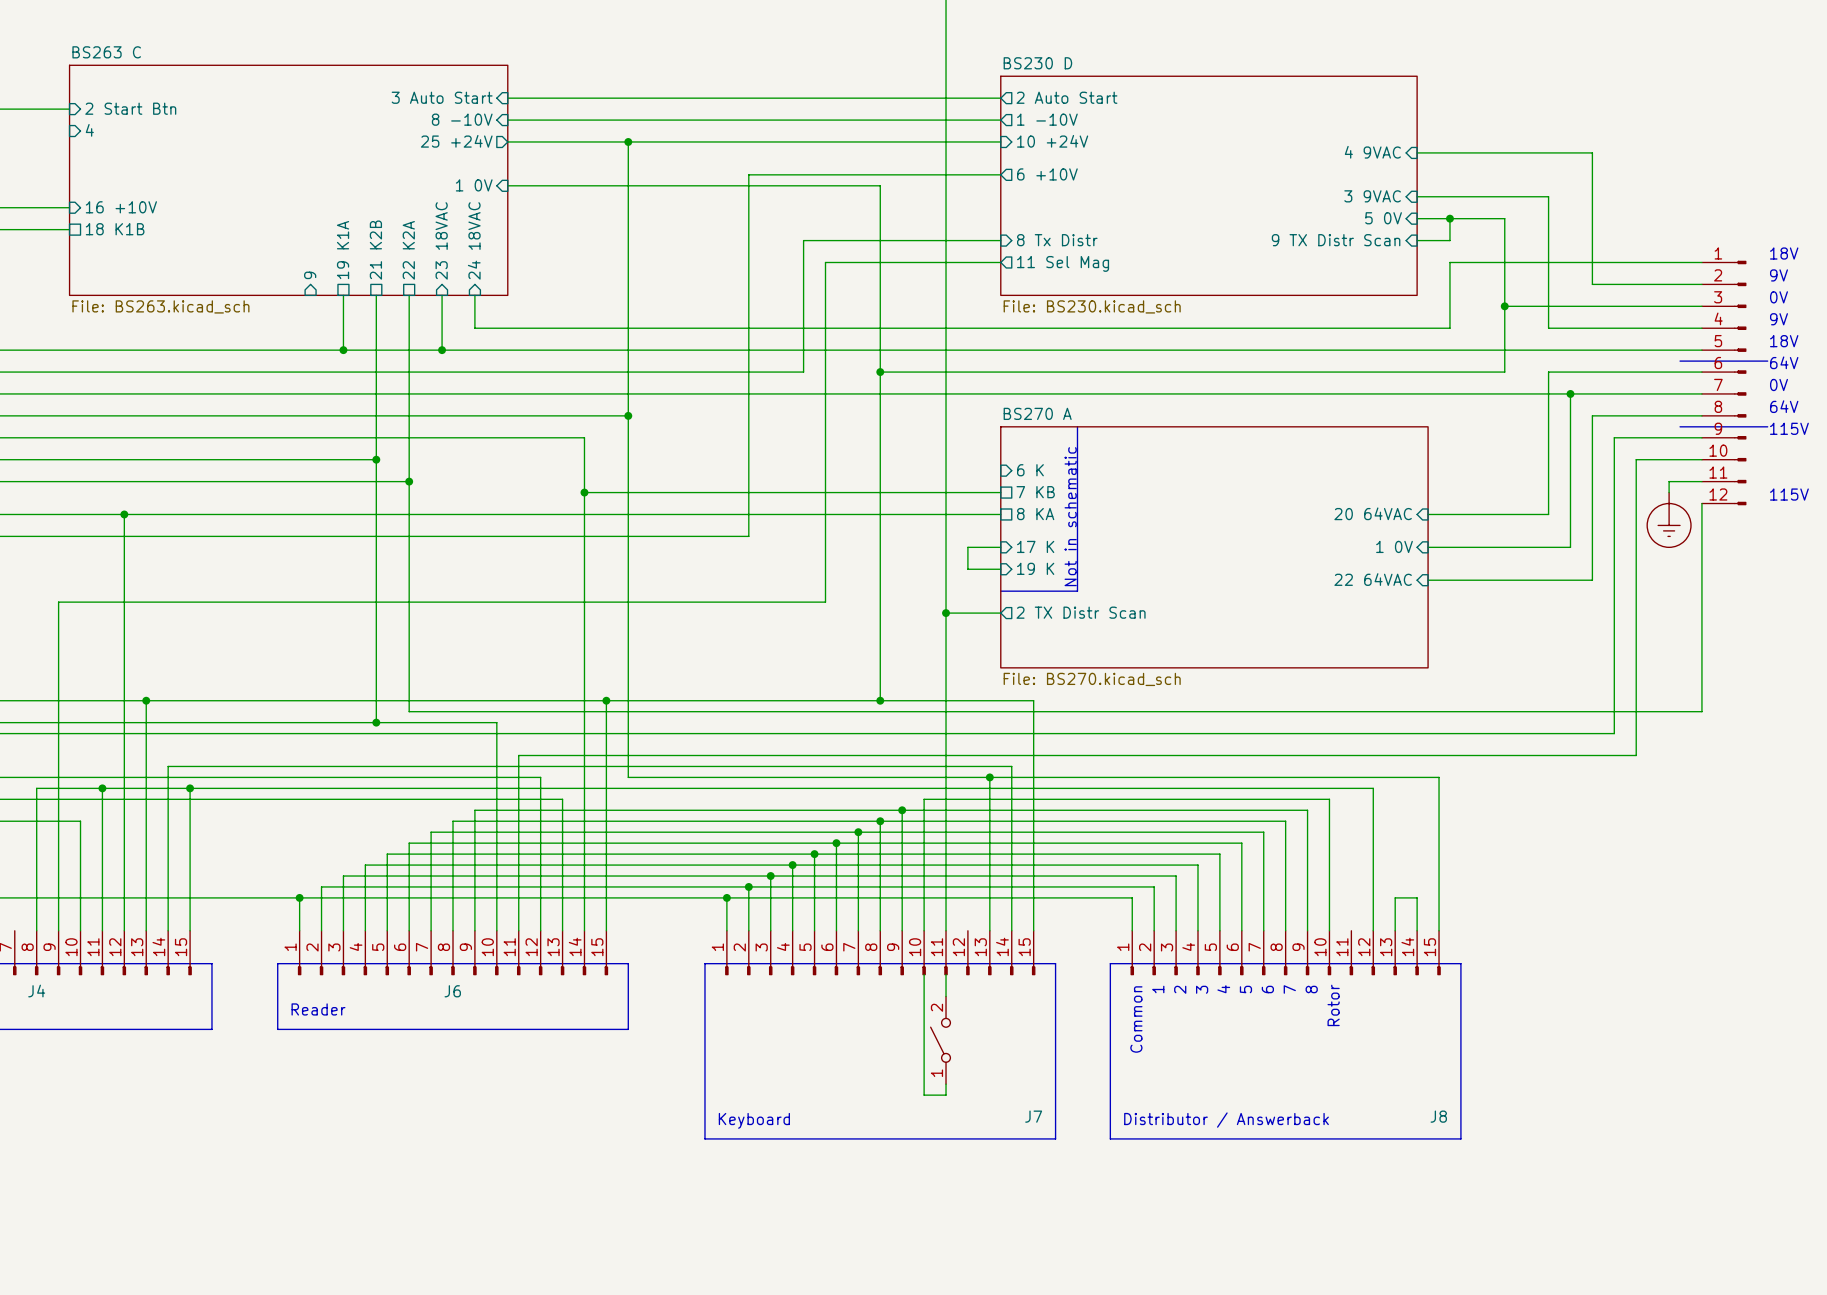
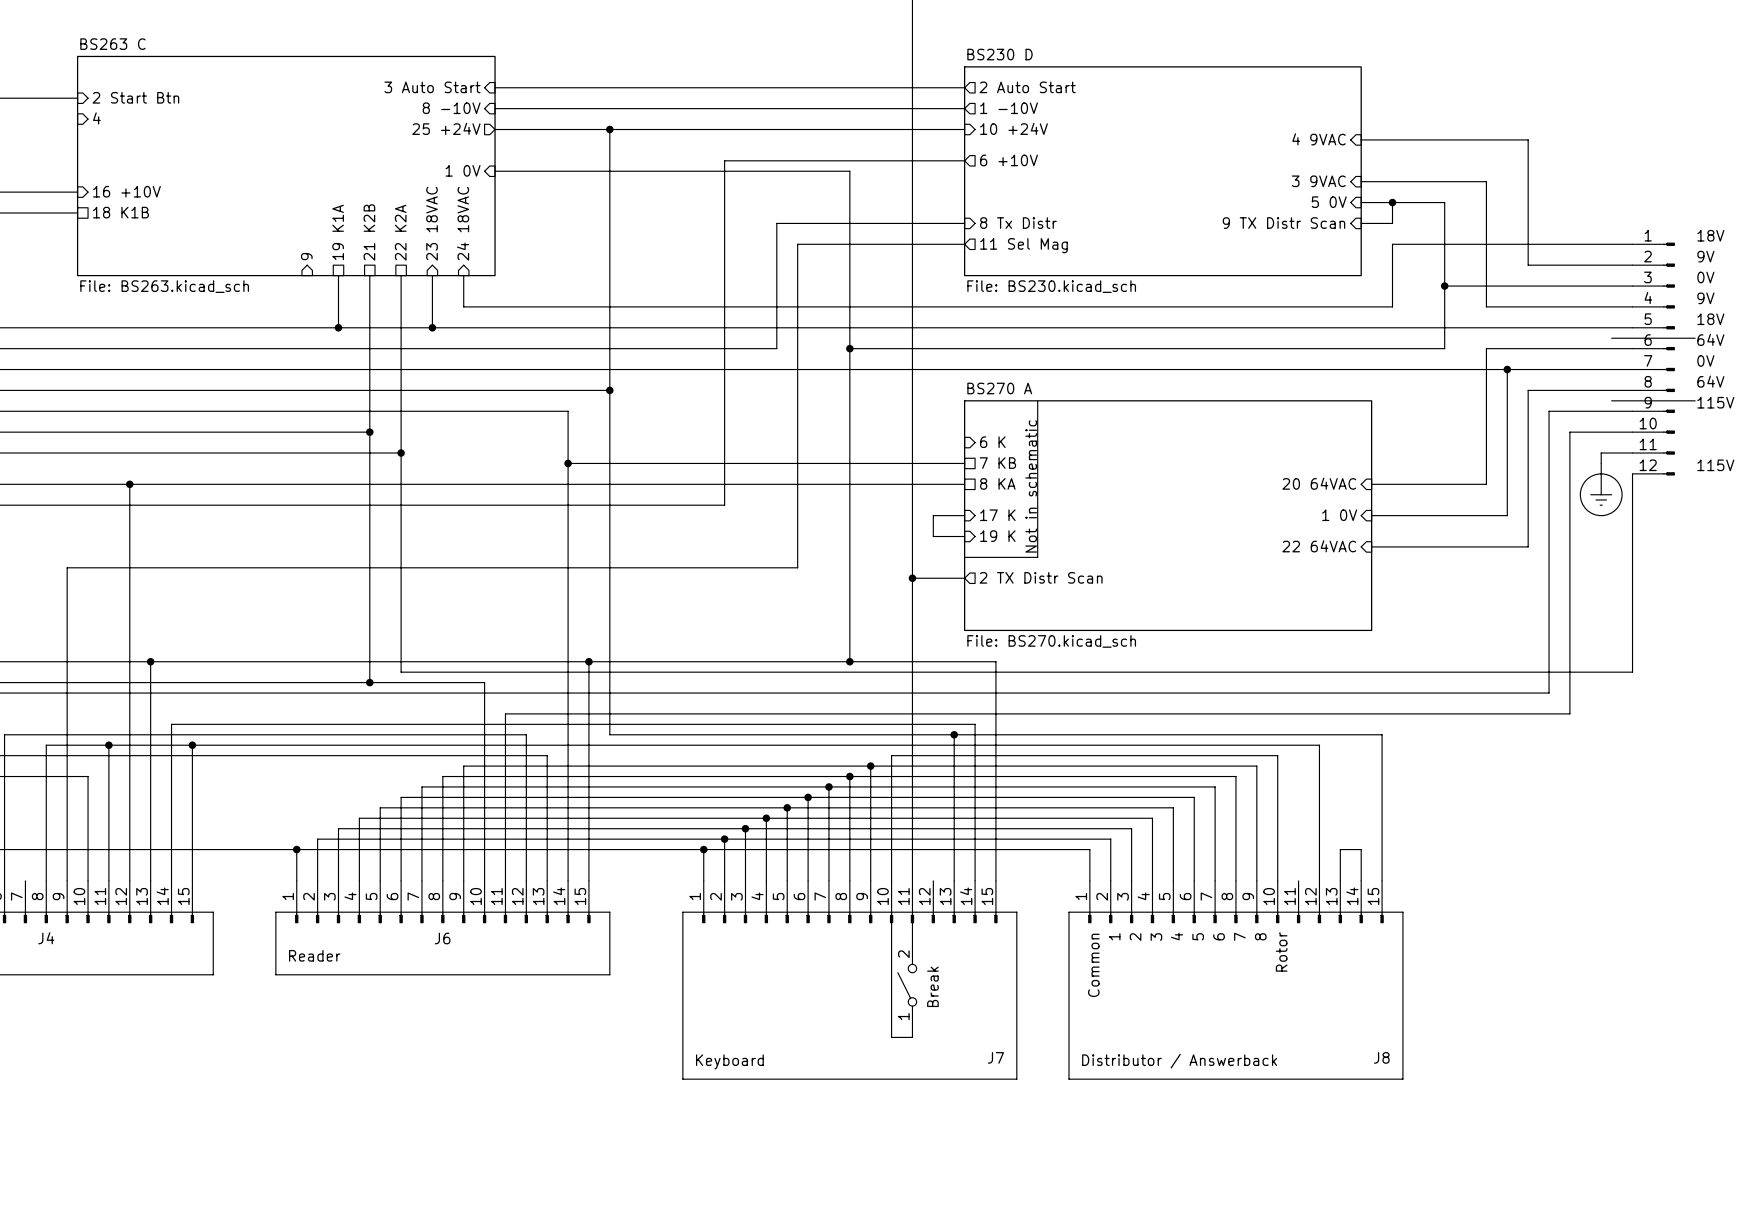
part value: none -> Break (932, 986)

